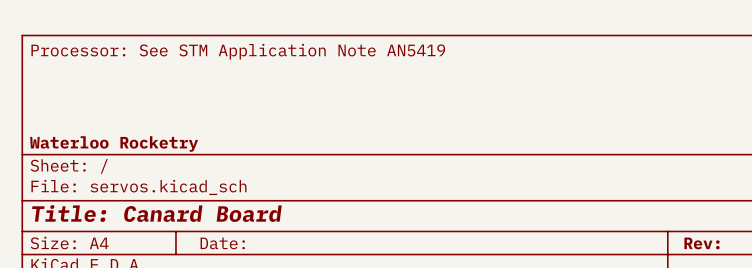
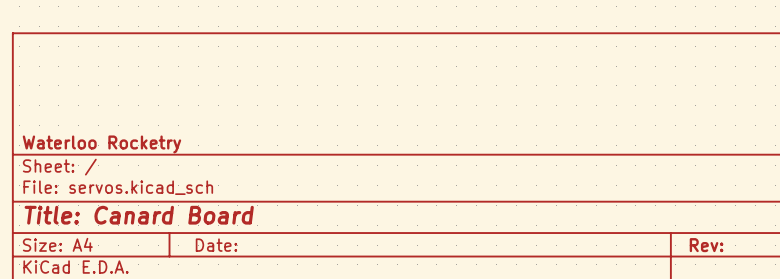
title block: Processor: See STM Application Note AN5419 (238, 51) -> none

